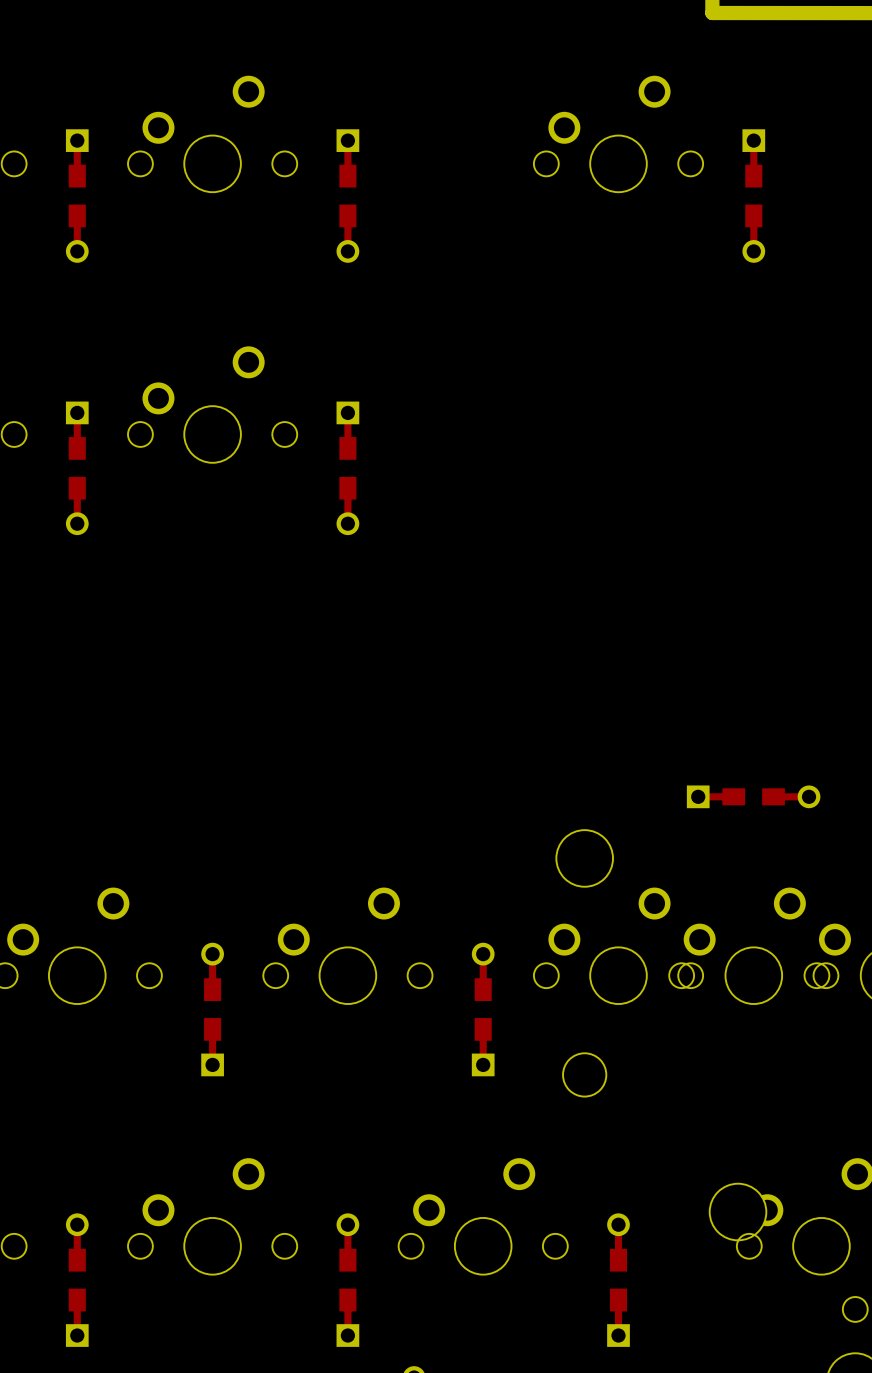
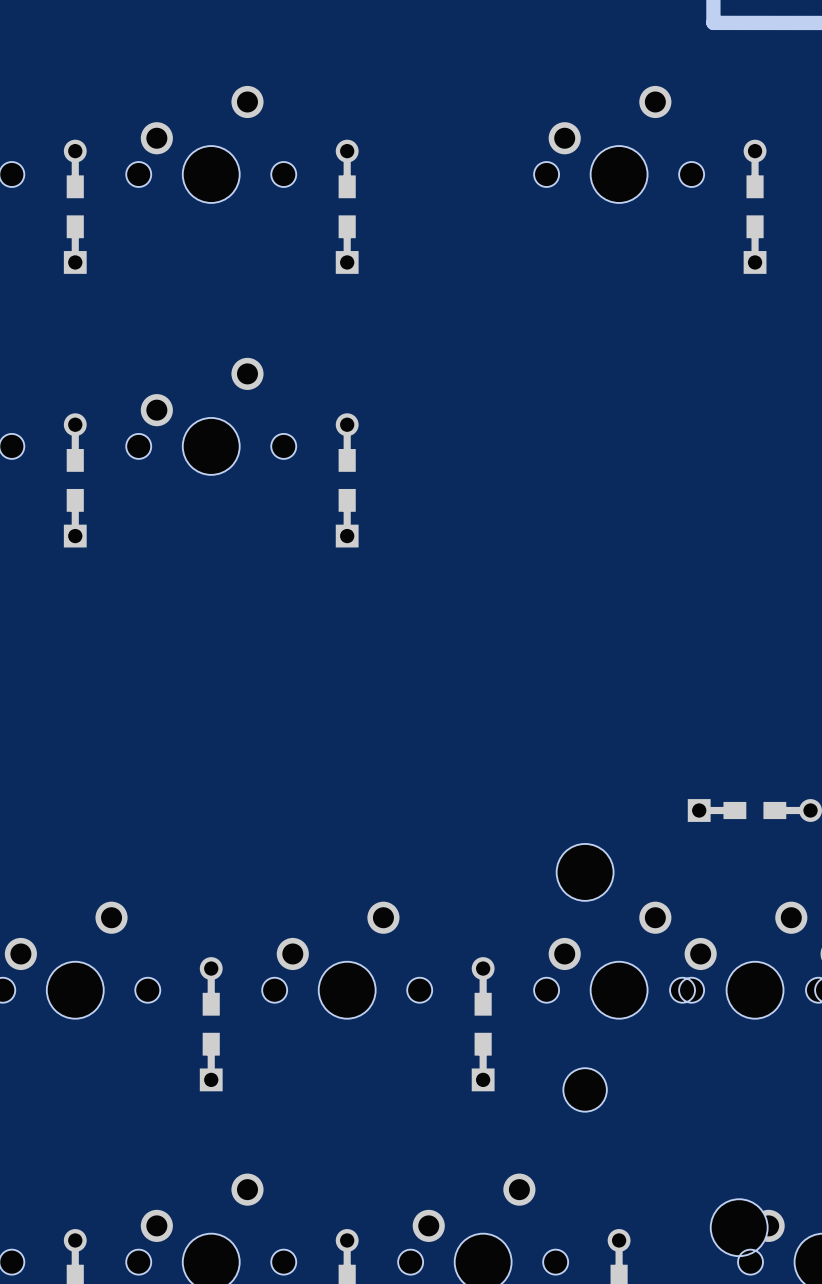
part rotation: 0° (77, 196) -> 180° (75, 206)
part rotation: 0° (347, 196) -> 180° (347, 206)
part rotation: 0° (753, 196) -> 180° (755, 206)
part rotation: 0° (77, 468) -> 180° (75, 480)
part rotation: 0° (347, 468) -> 180° (347, 480)

